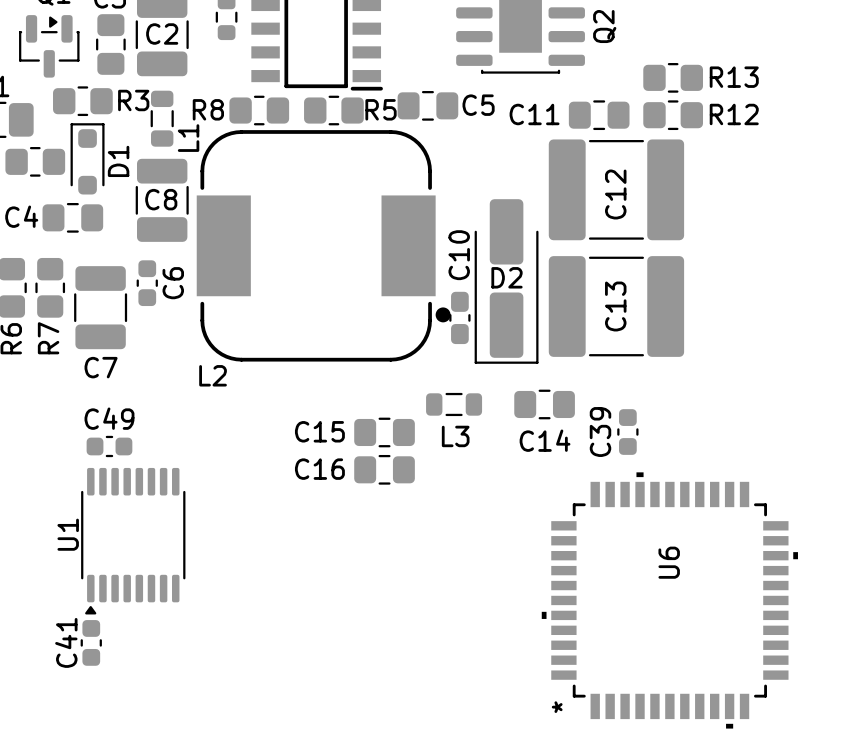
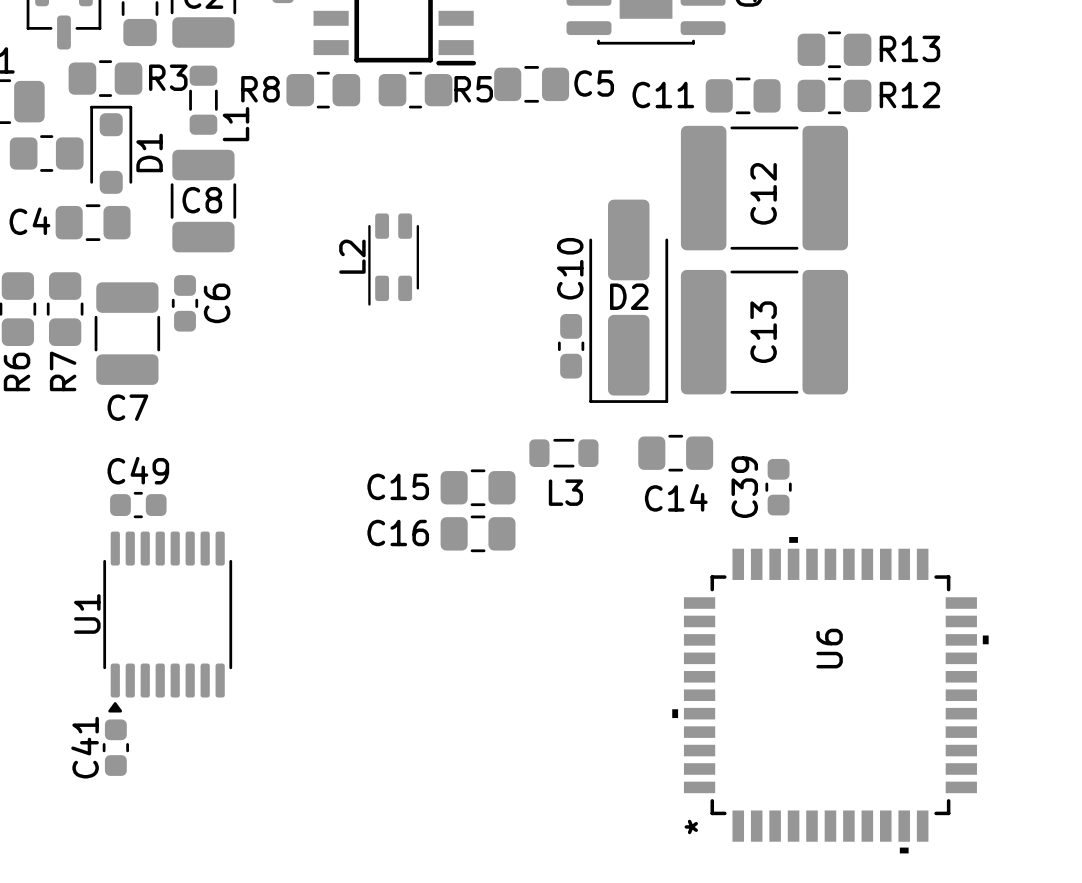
L2 footprint: [196, 130, 451, 362] -> [368, 213, 419, 306]
L2 name position: L2 (213, 375) -> L2 (352, 256)

